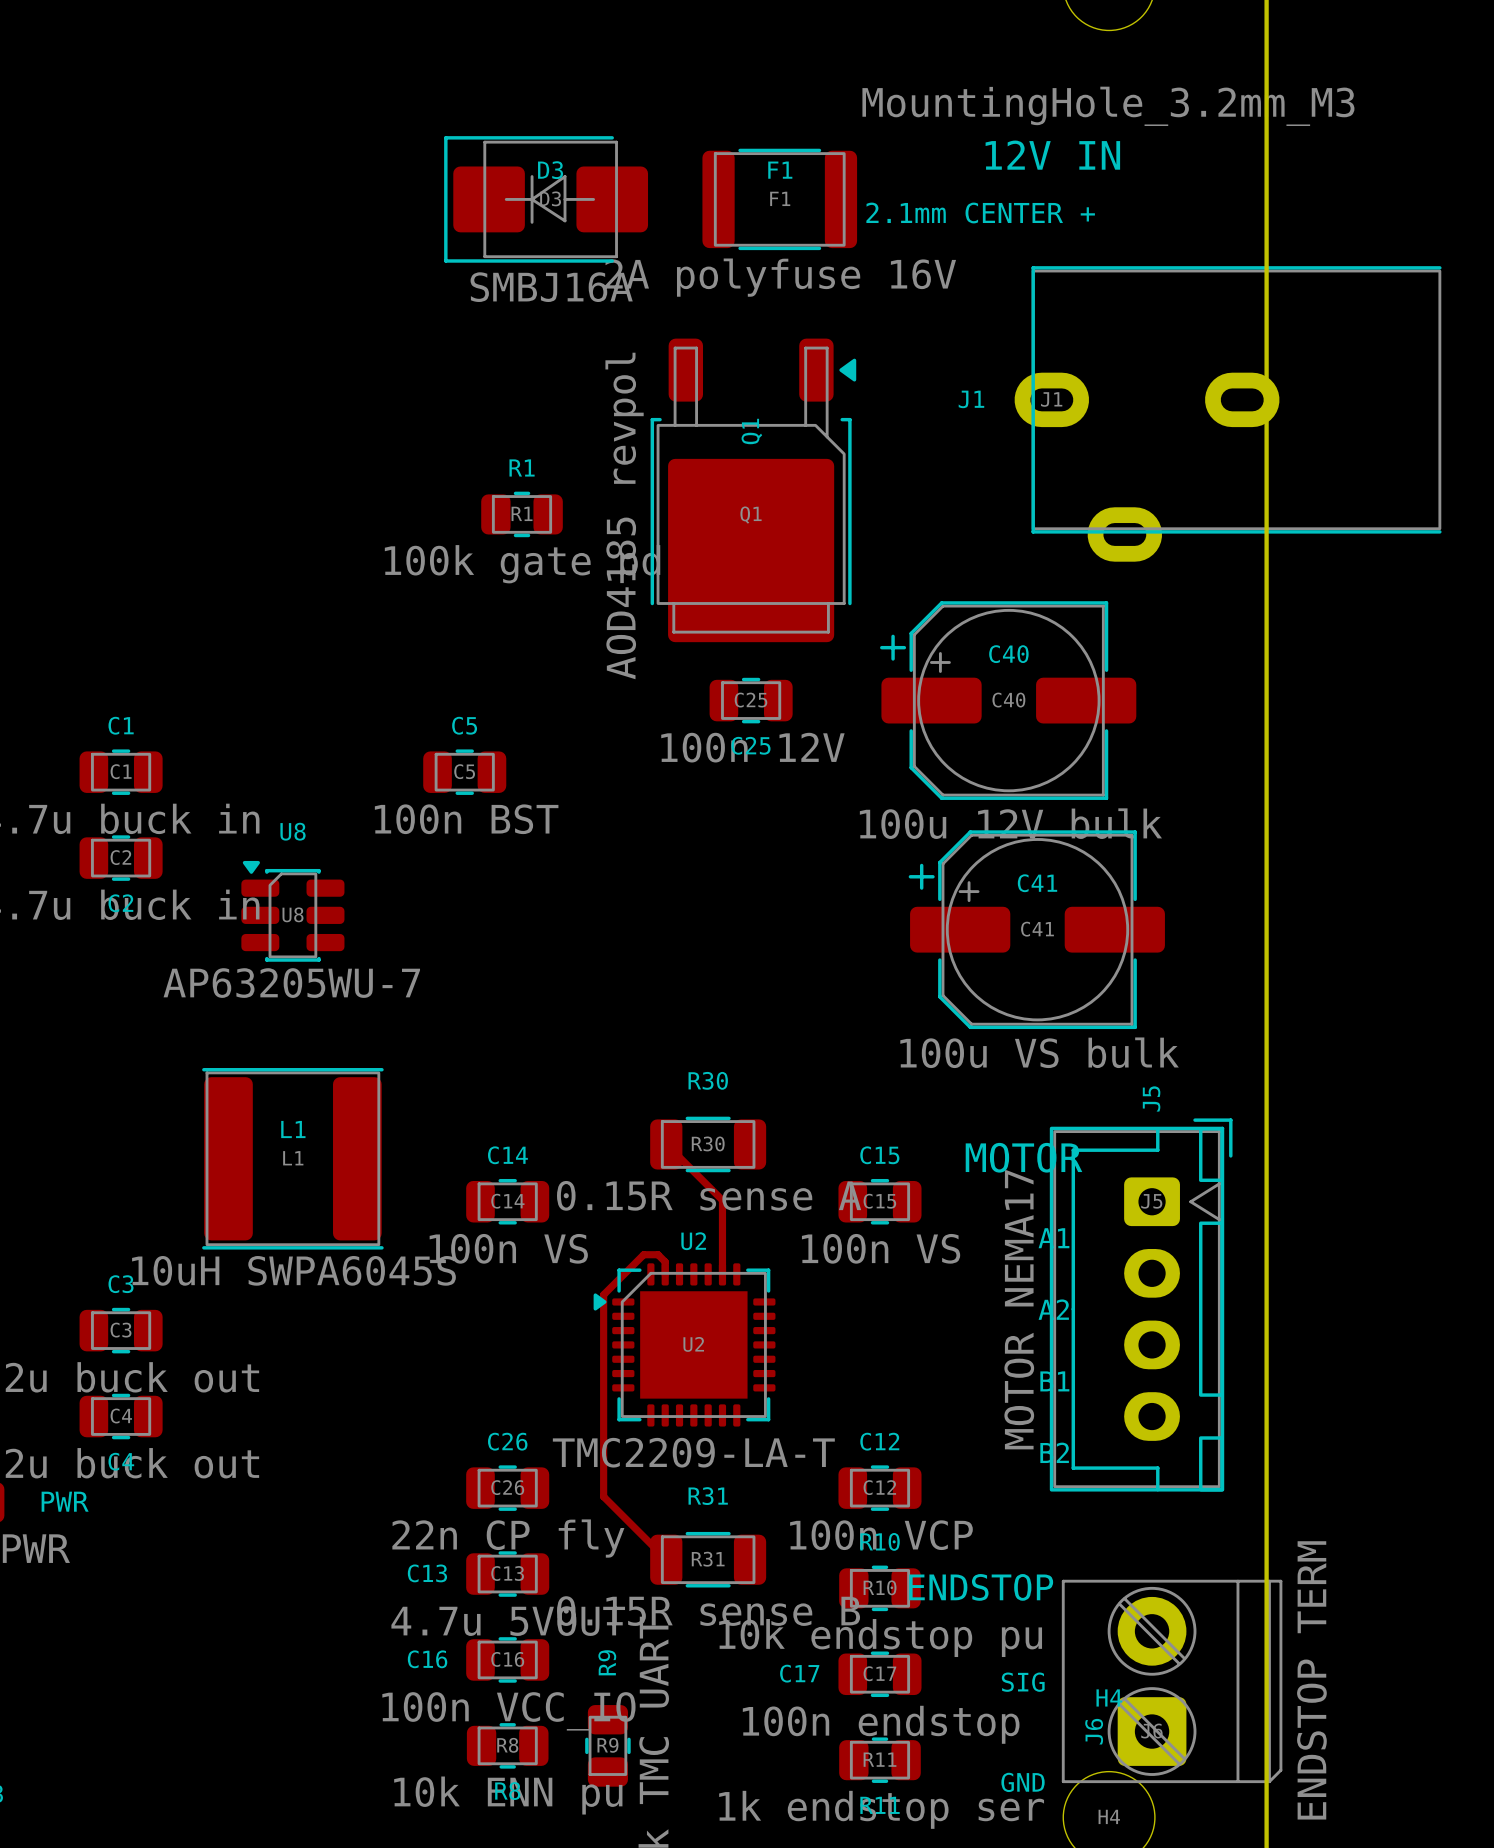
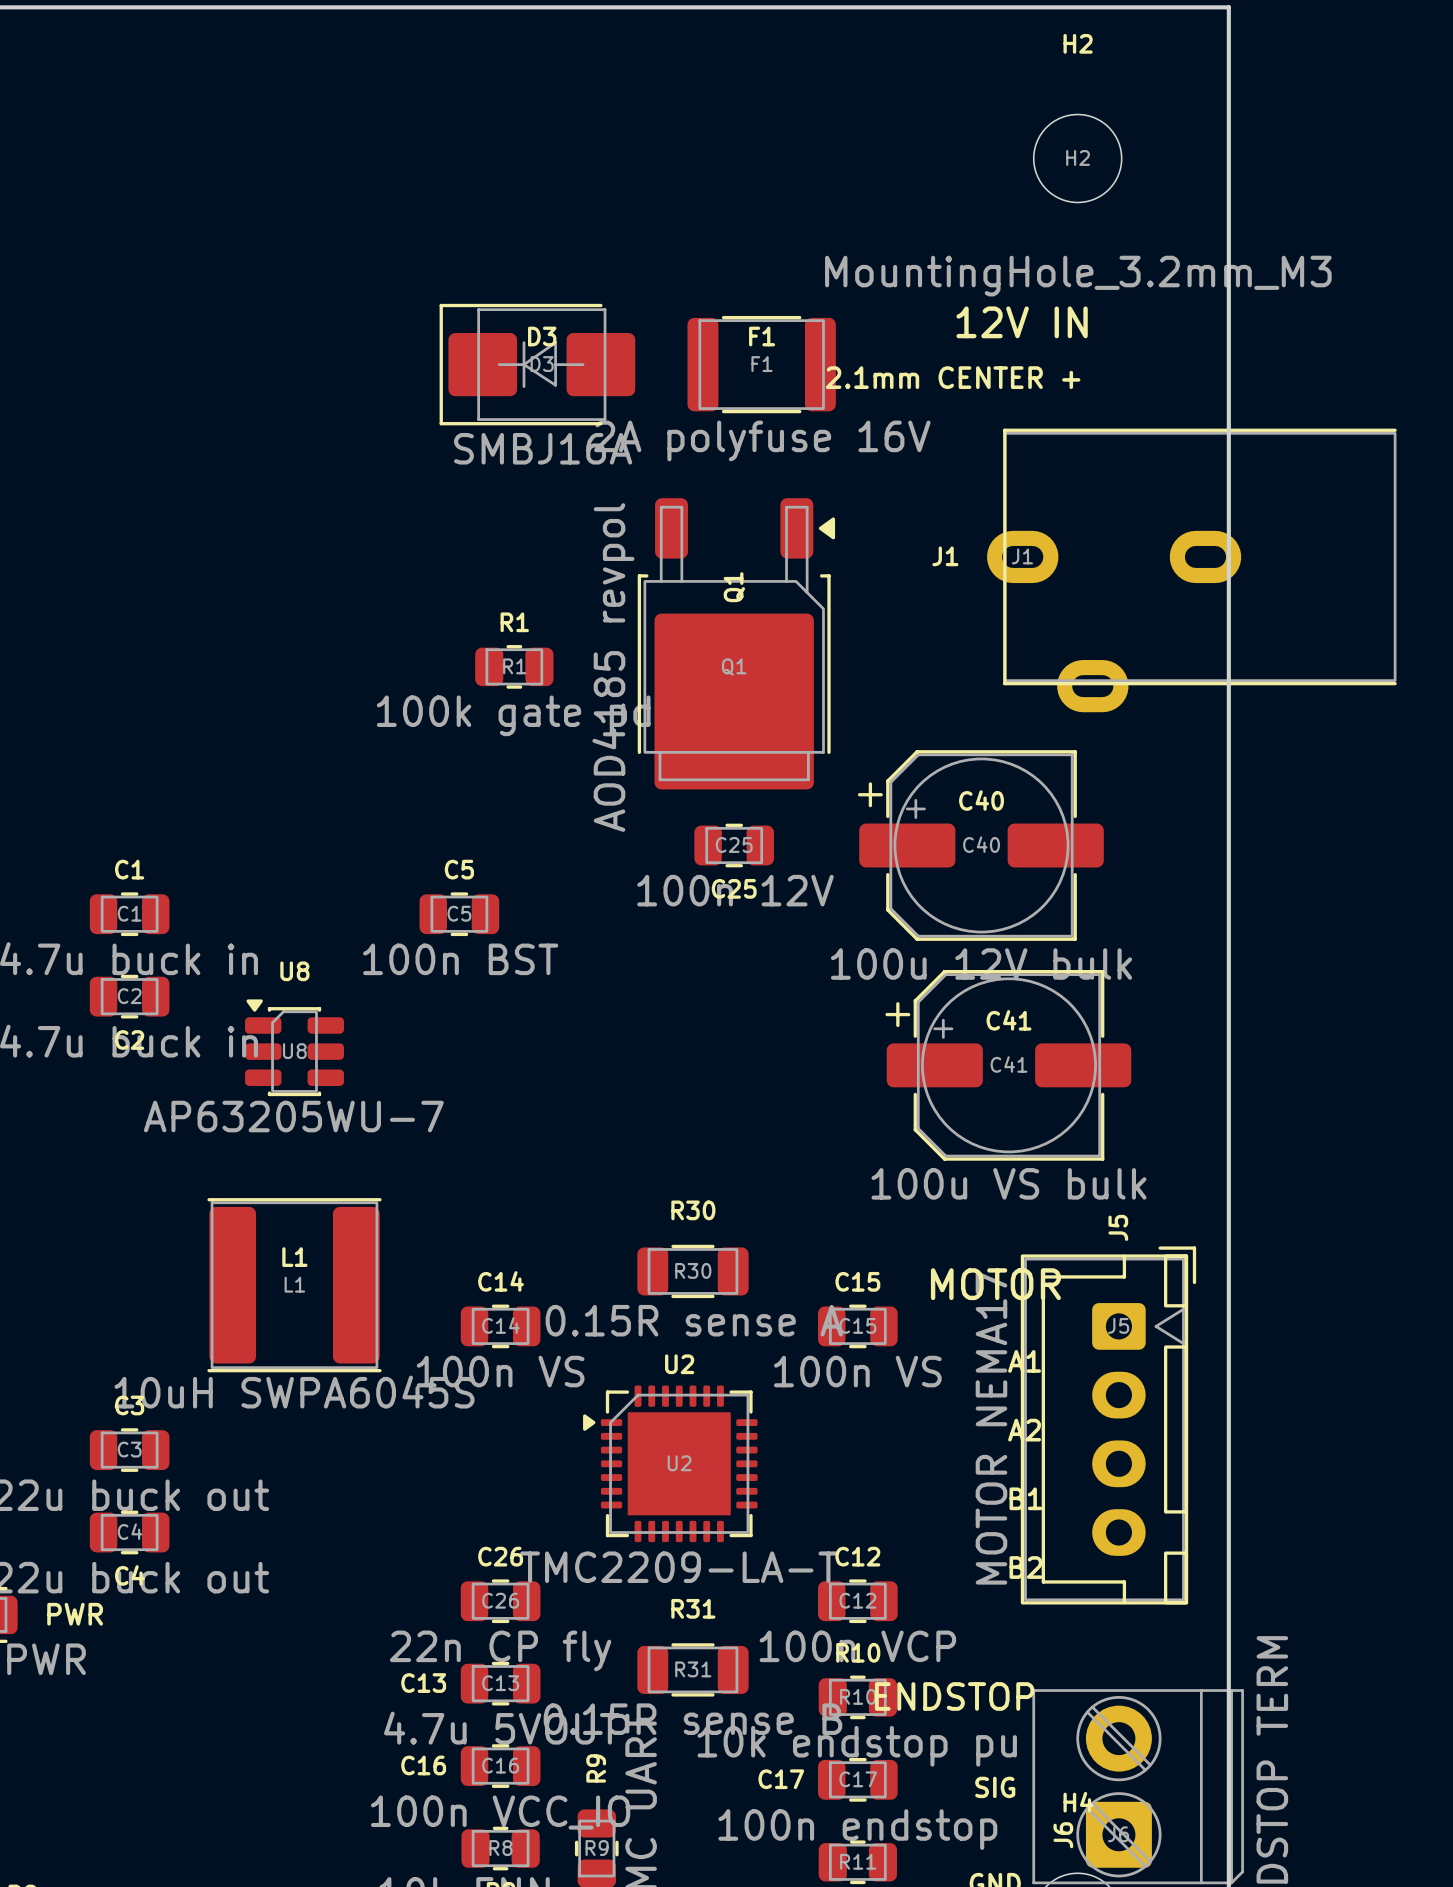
top track: (666, 1144) (722, 1200) (722, 1274) -> none
top track: (665, 1274) (665, 1261) (658, 1254) (643, 1254) (603, 1294) (603, 1496) (666, 1559) -> none

